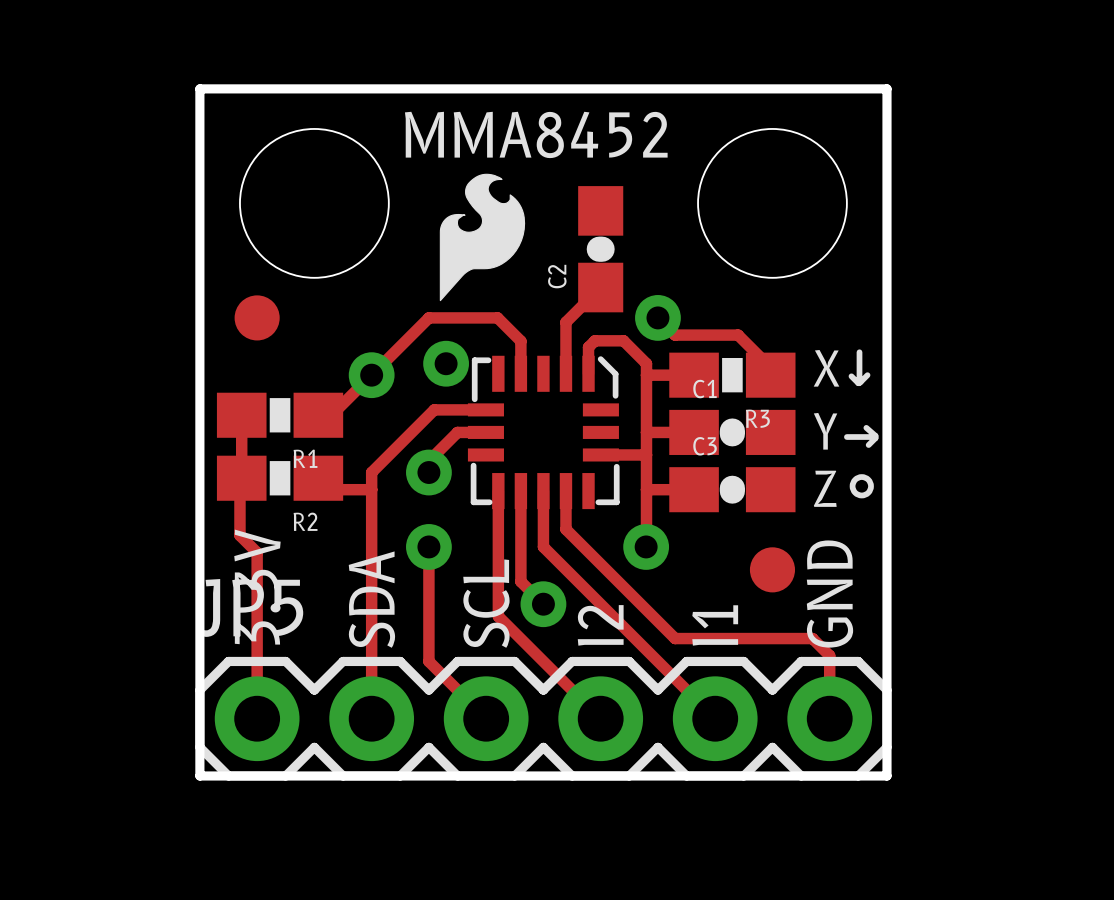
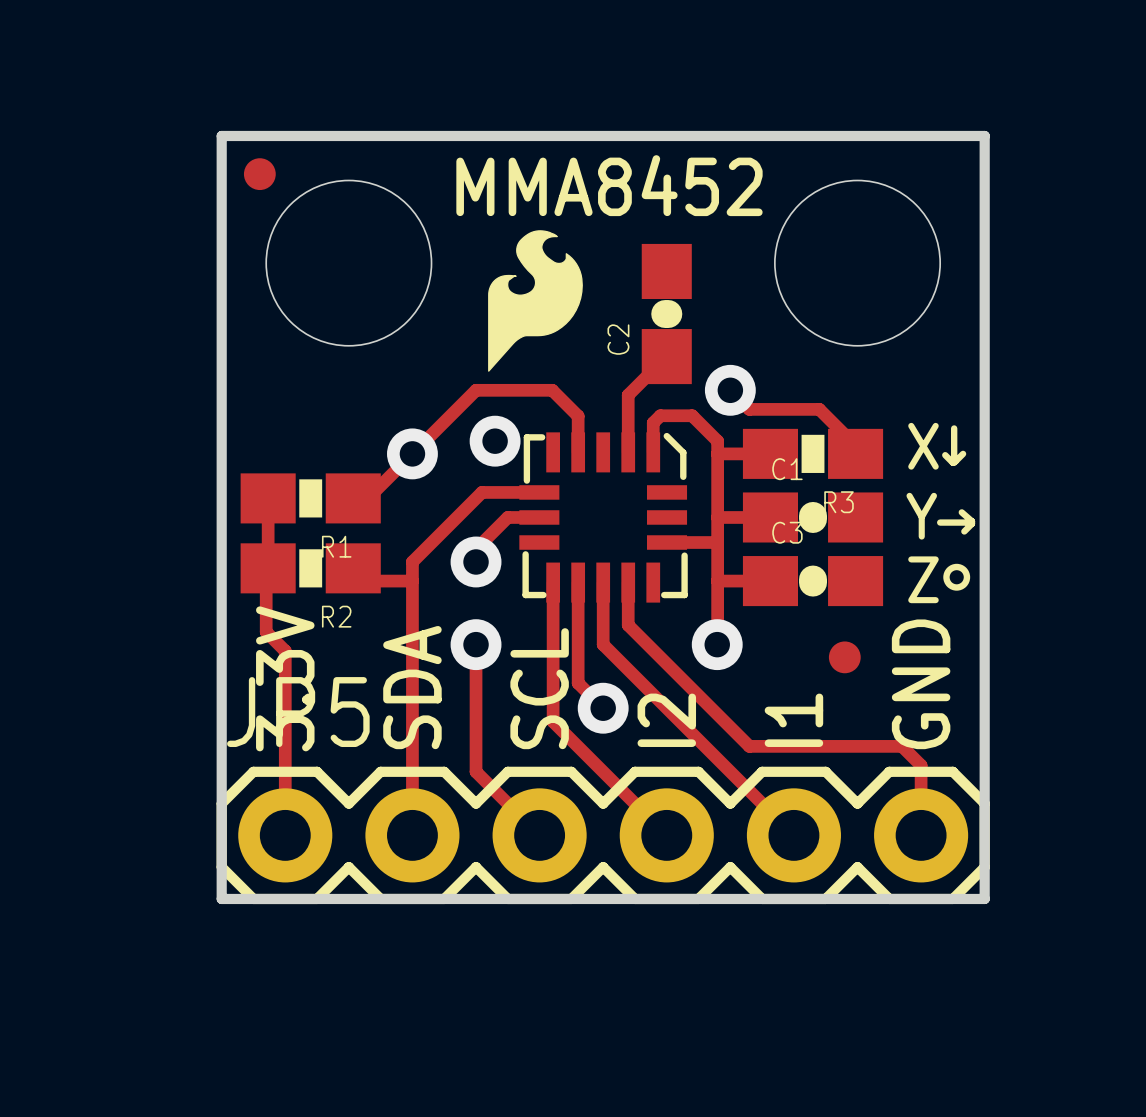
part: none -> (259, 174)
part: (257, 317) -> none
part footprint: [749, 547, 796, 593] -> [828, 641, 861, 674]

